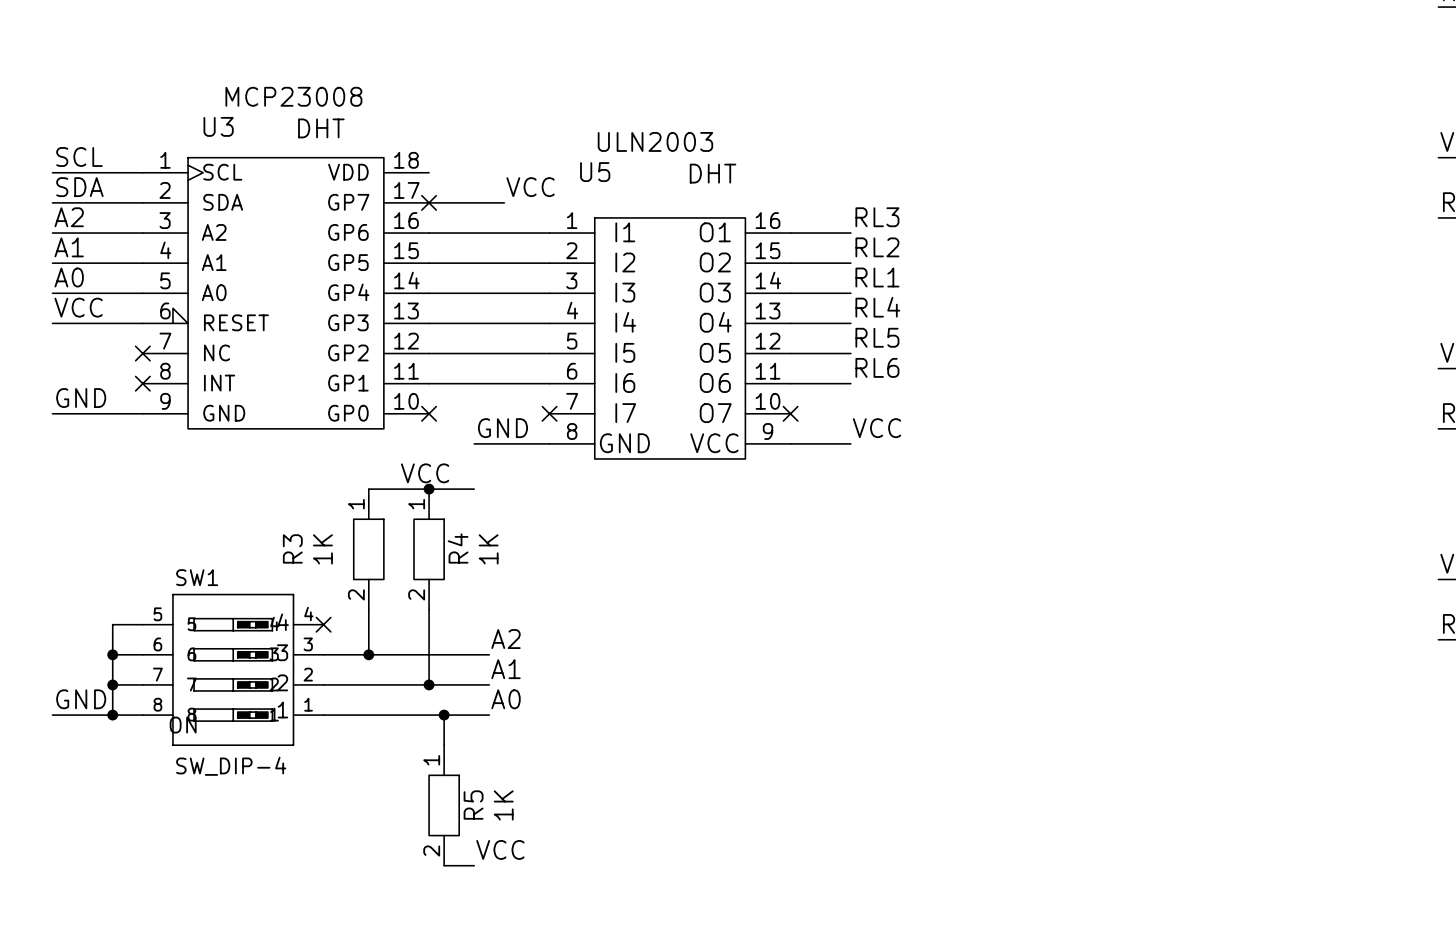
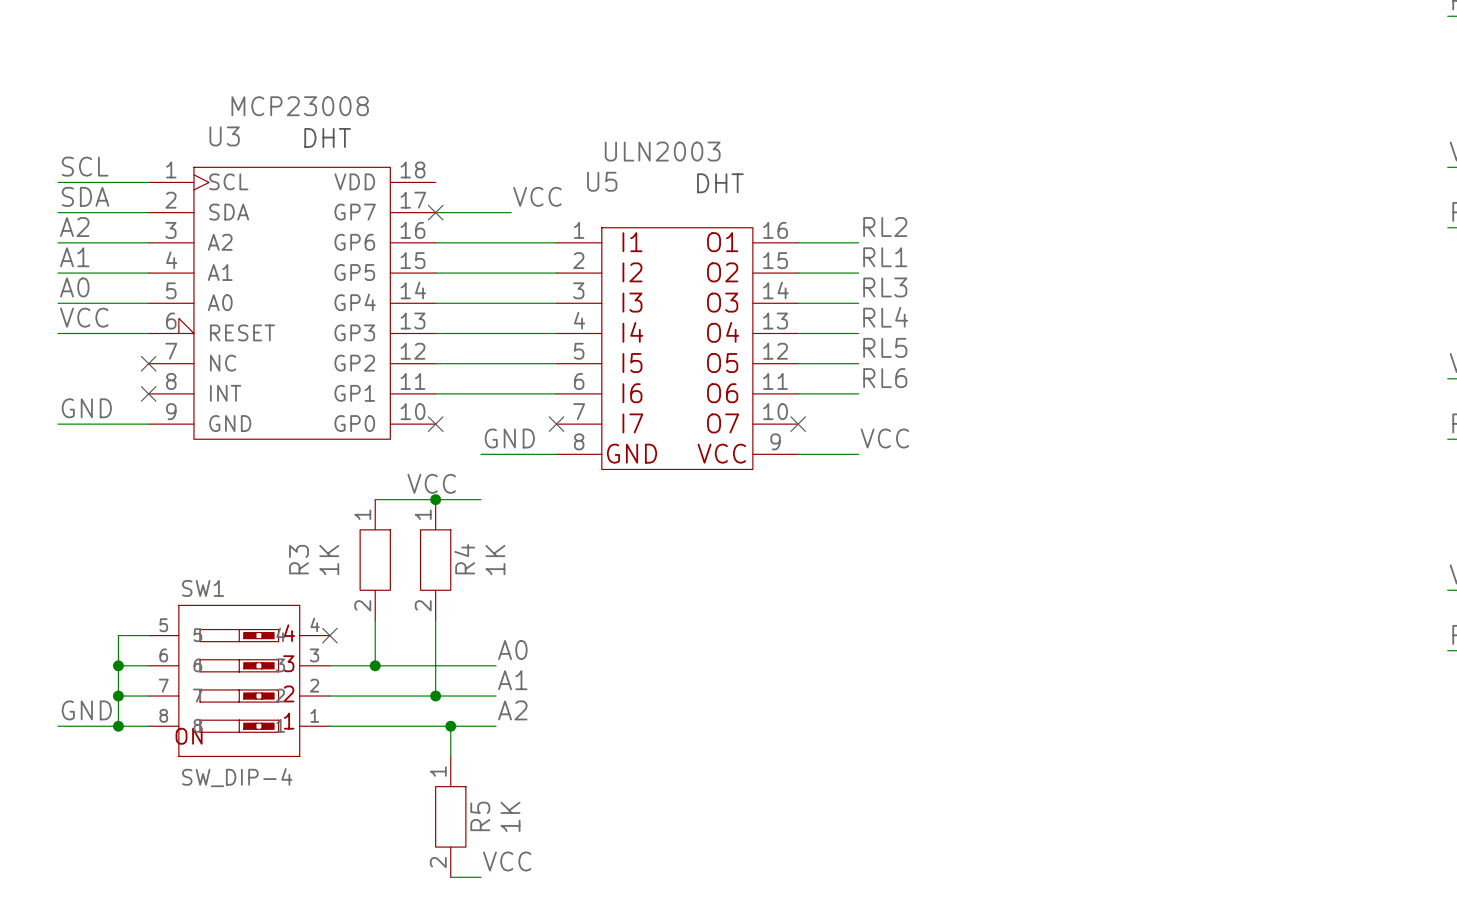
label: RL3 (877, 217) -> RL2 (885, 227)
label: RL2 (877, 247) -> RL1 (885, 257)
label: RL1 (877, 277) -> RL3 (885, 287)
label: A2 (506, 639) -> A0 (512, 650)
label: A0 (506, 699) -> A2 (512, 710)

